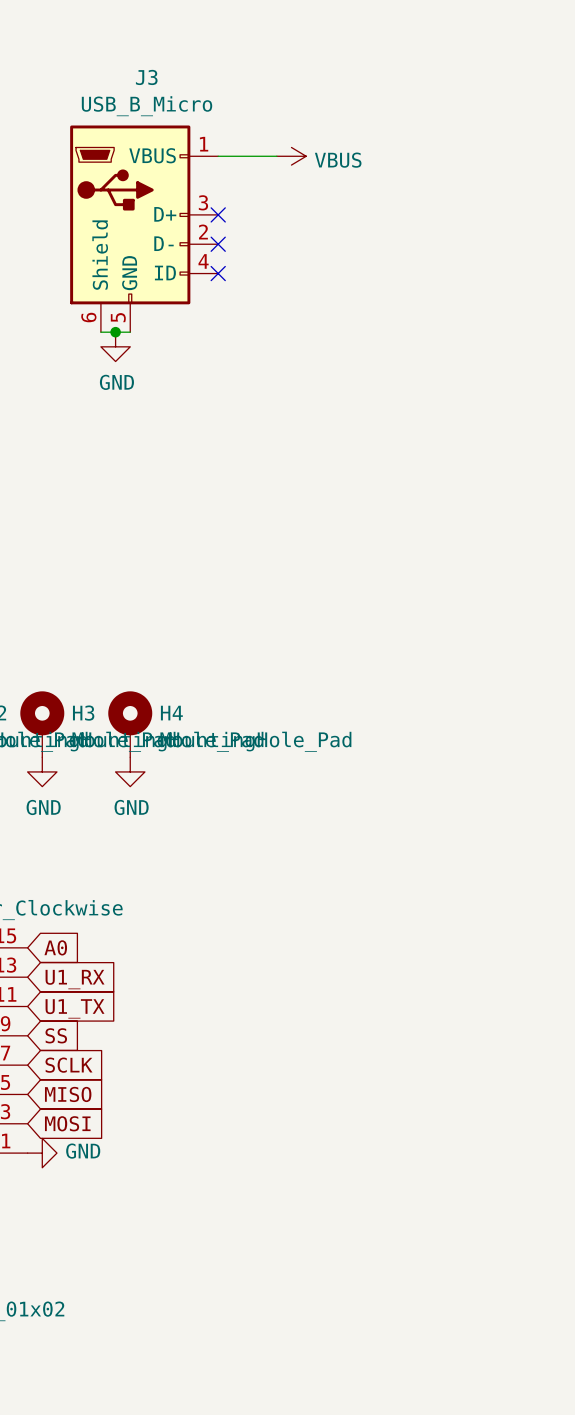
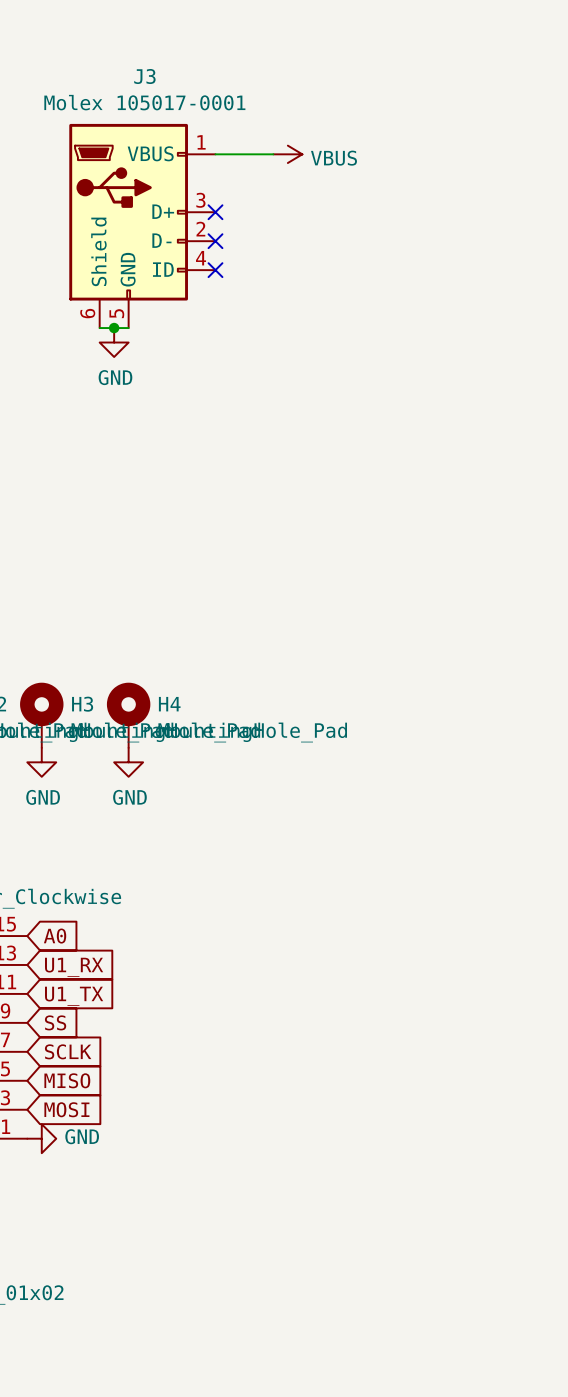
J3 value: USB_B_Micro (147, 106) -> Molex 105017-0001 (144, 102)

